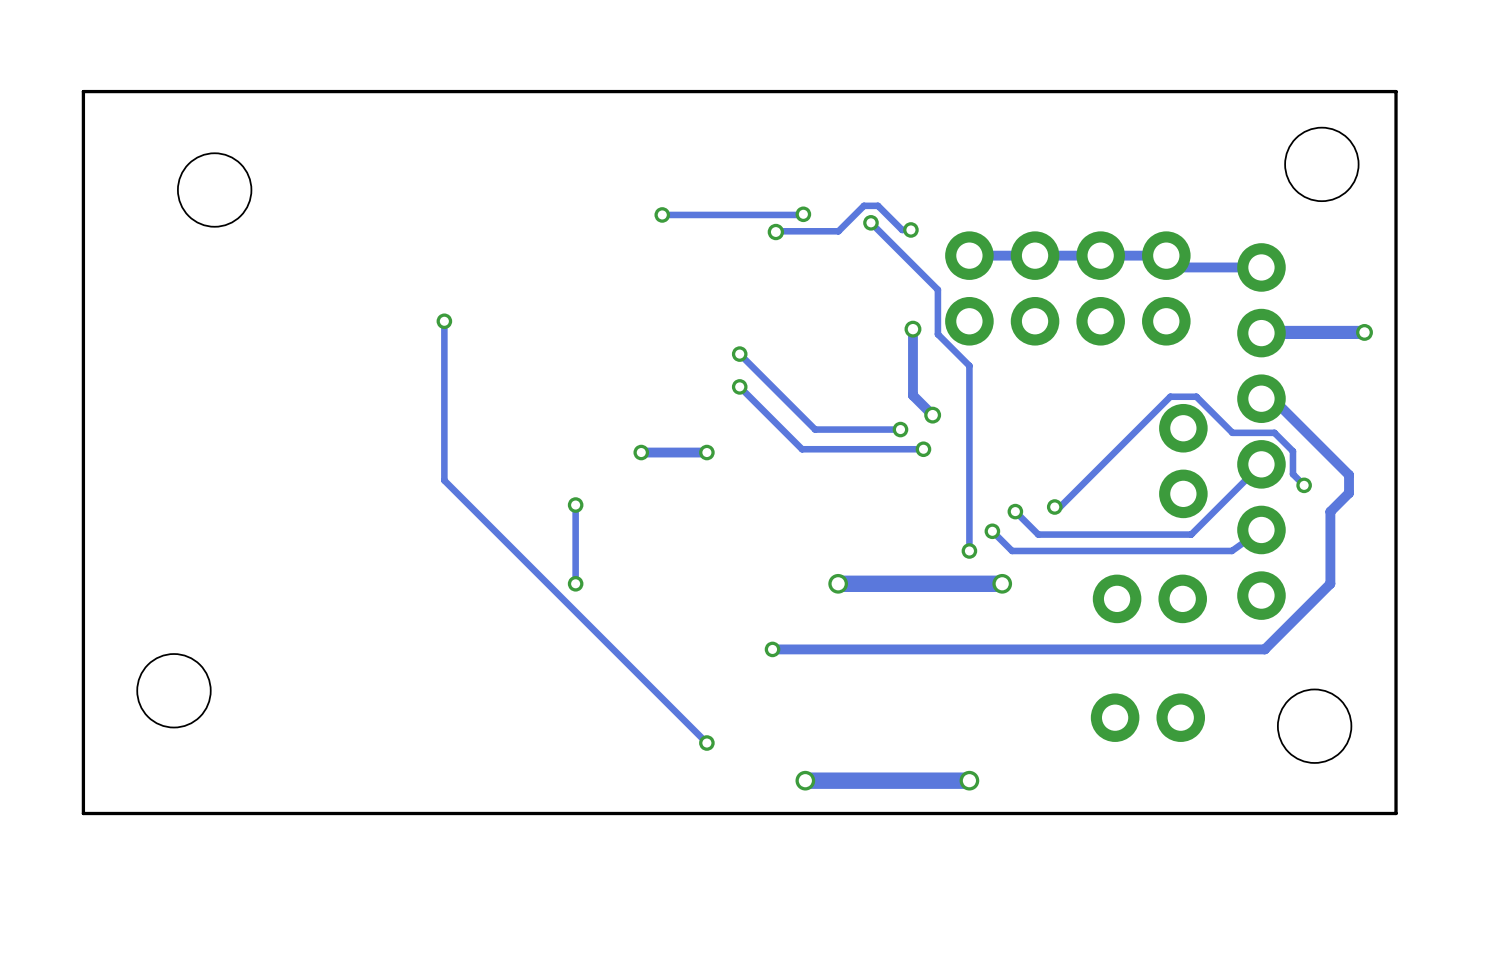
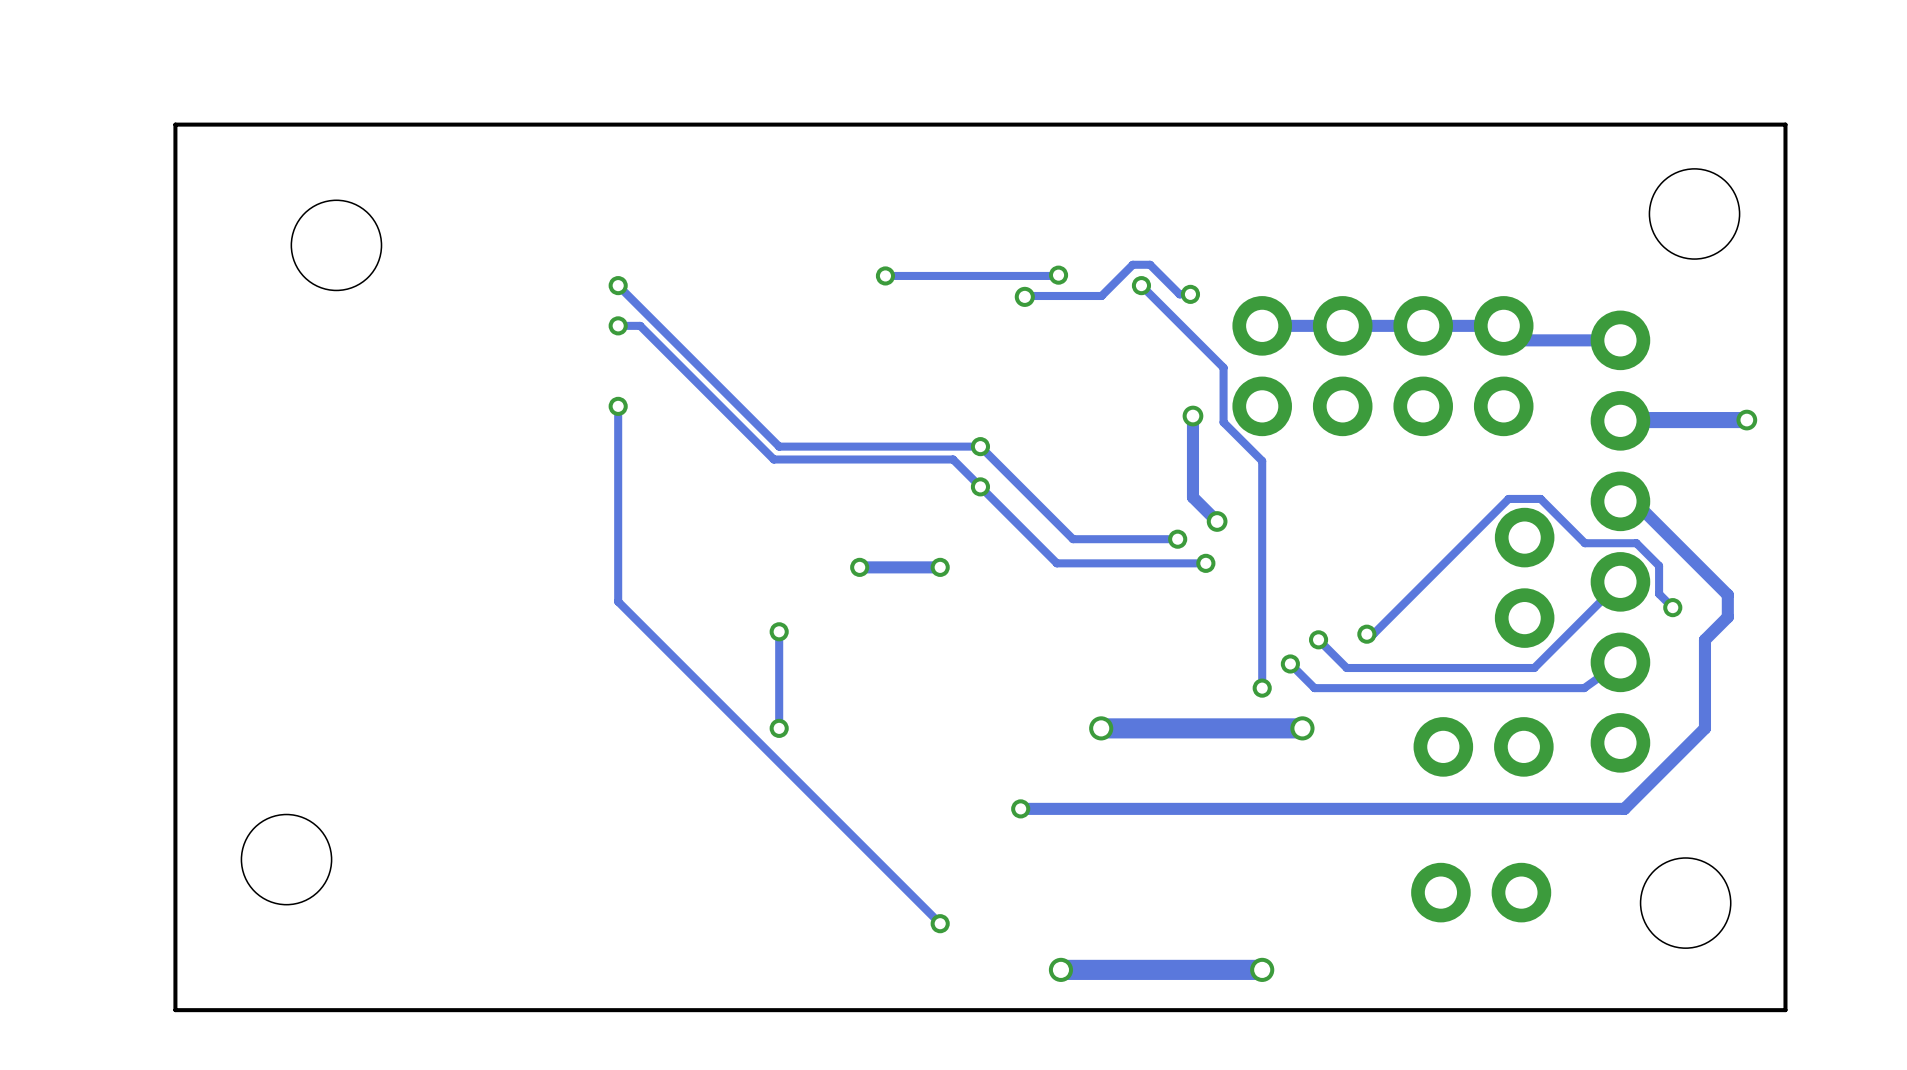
track: none -> (618, 285) (779, 446) (980, 446)
via: none -> (618, 285)
track: none -> (618, 325) (640, 325) (773, 459) (953, 459) (980, 486)
via: none -> (618, 325)

